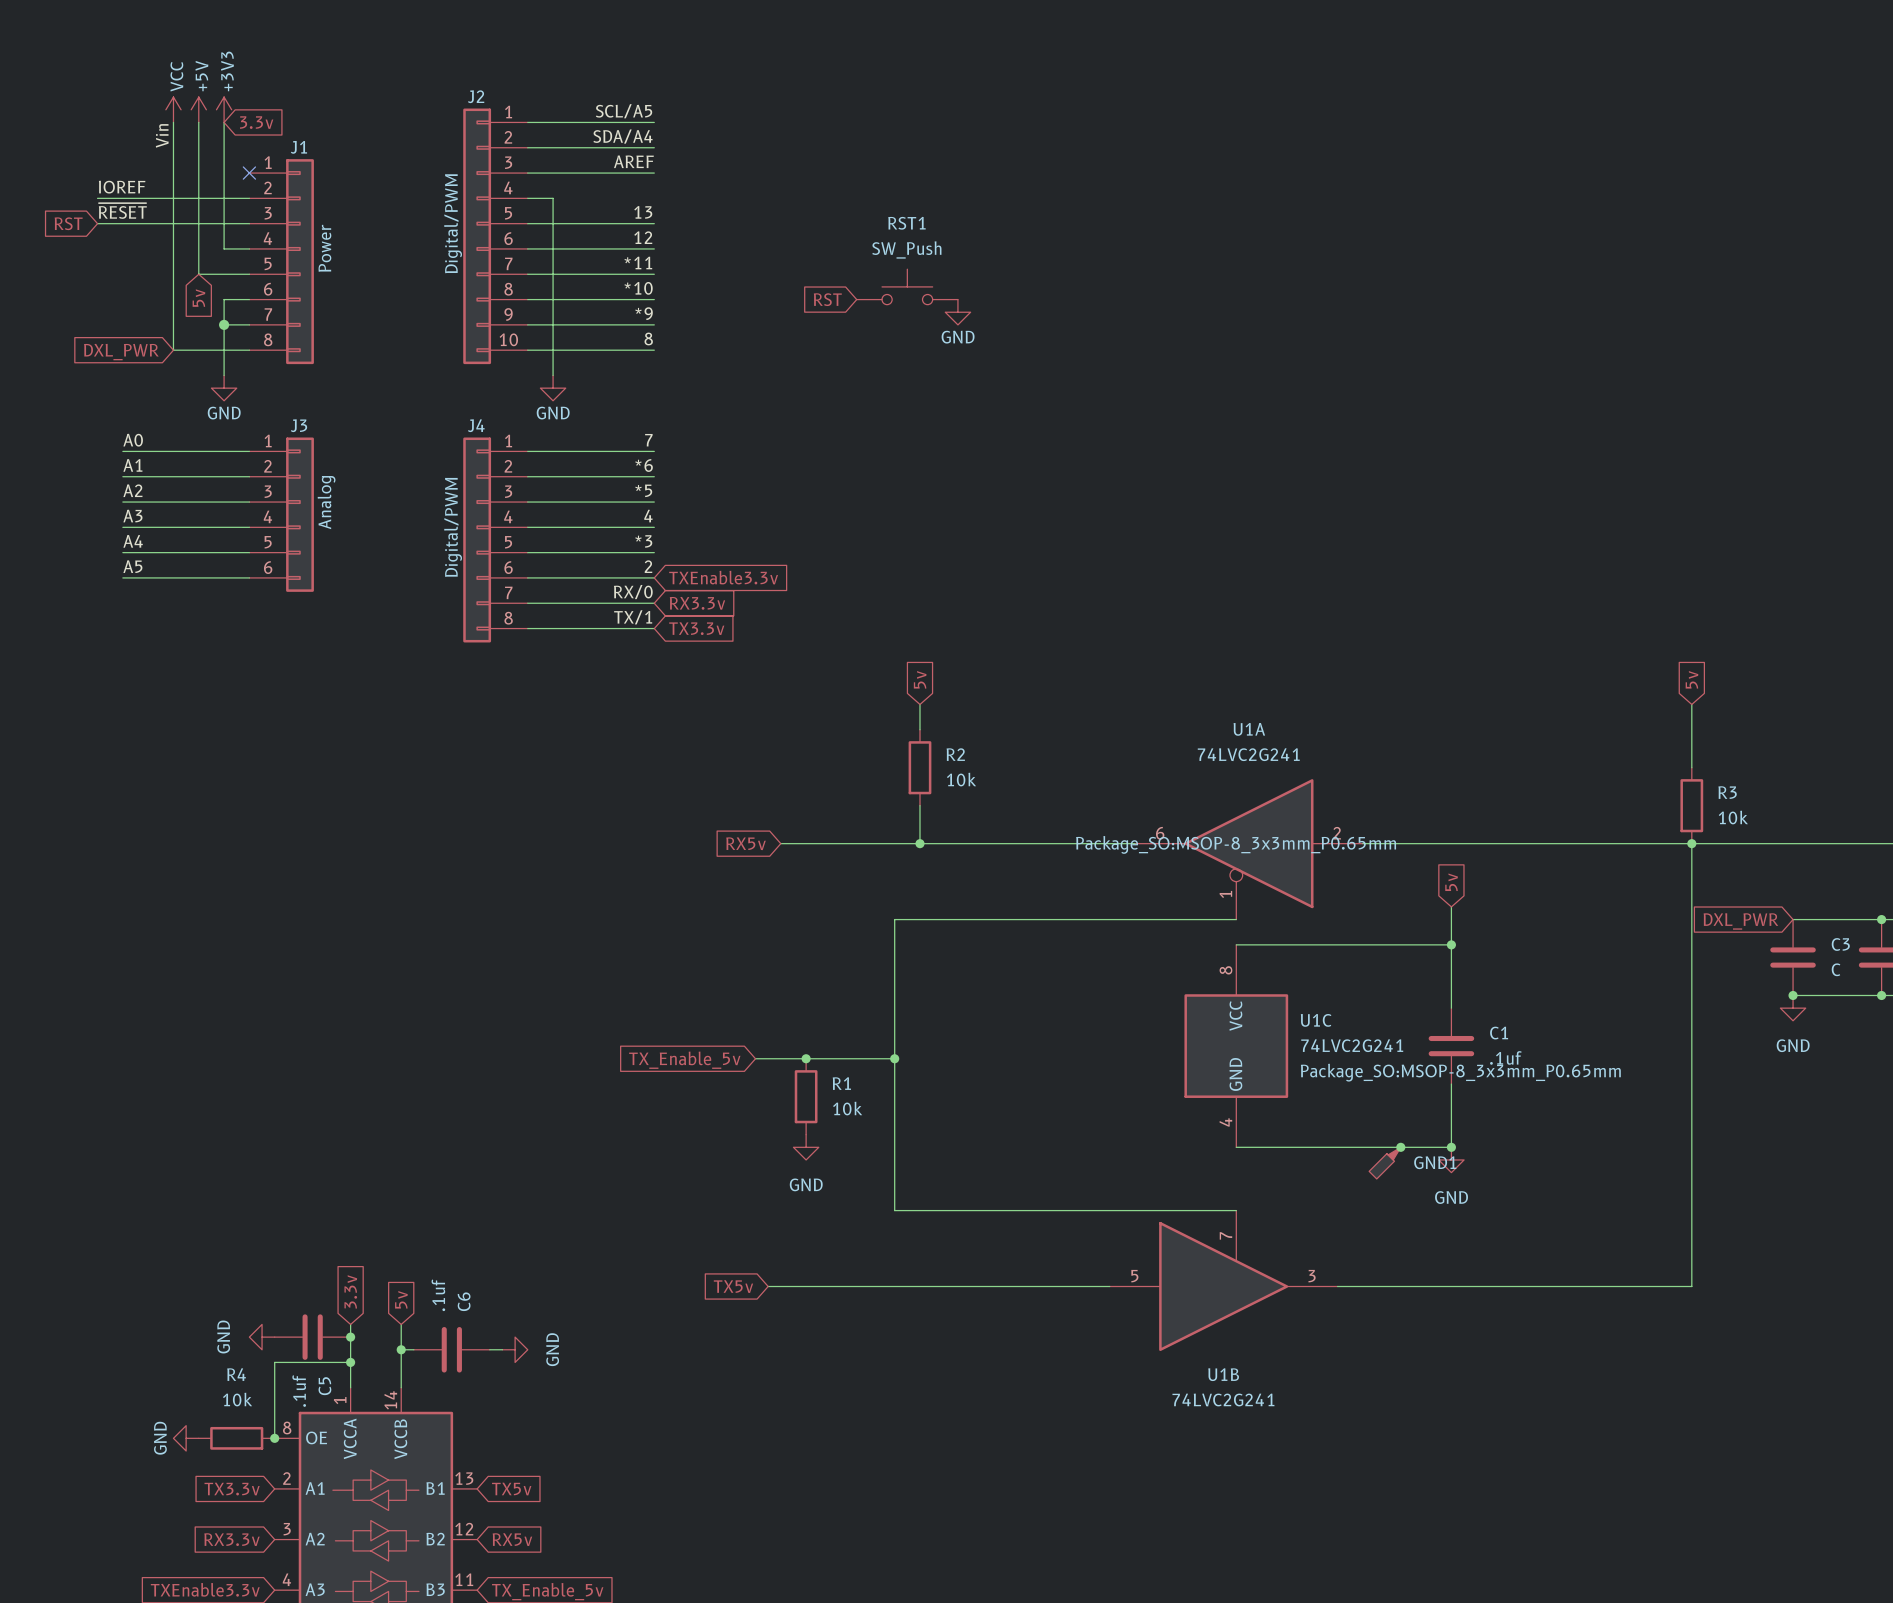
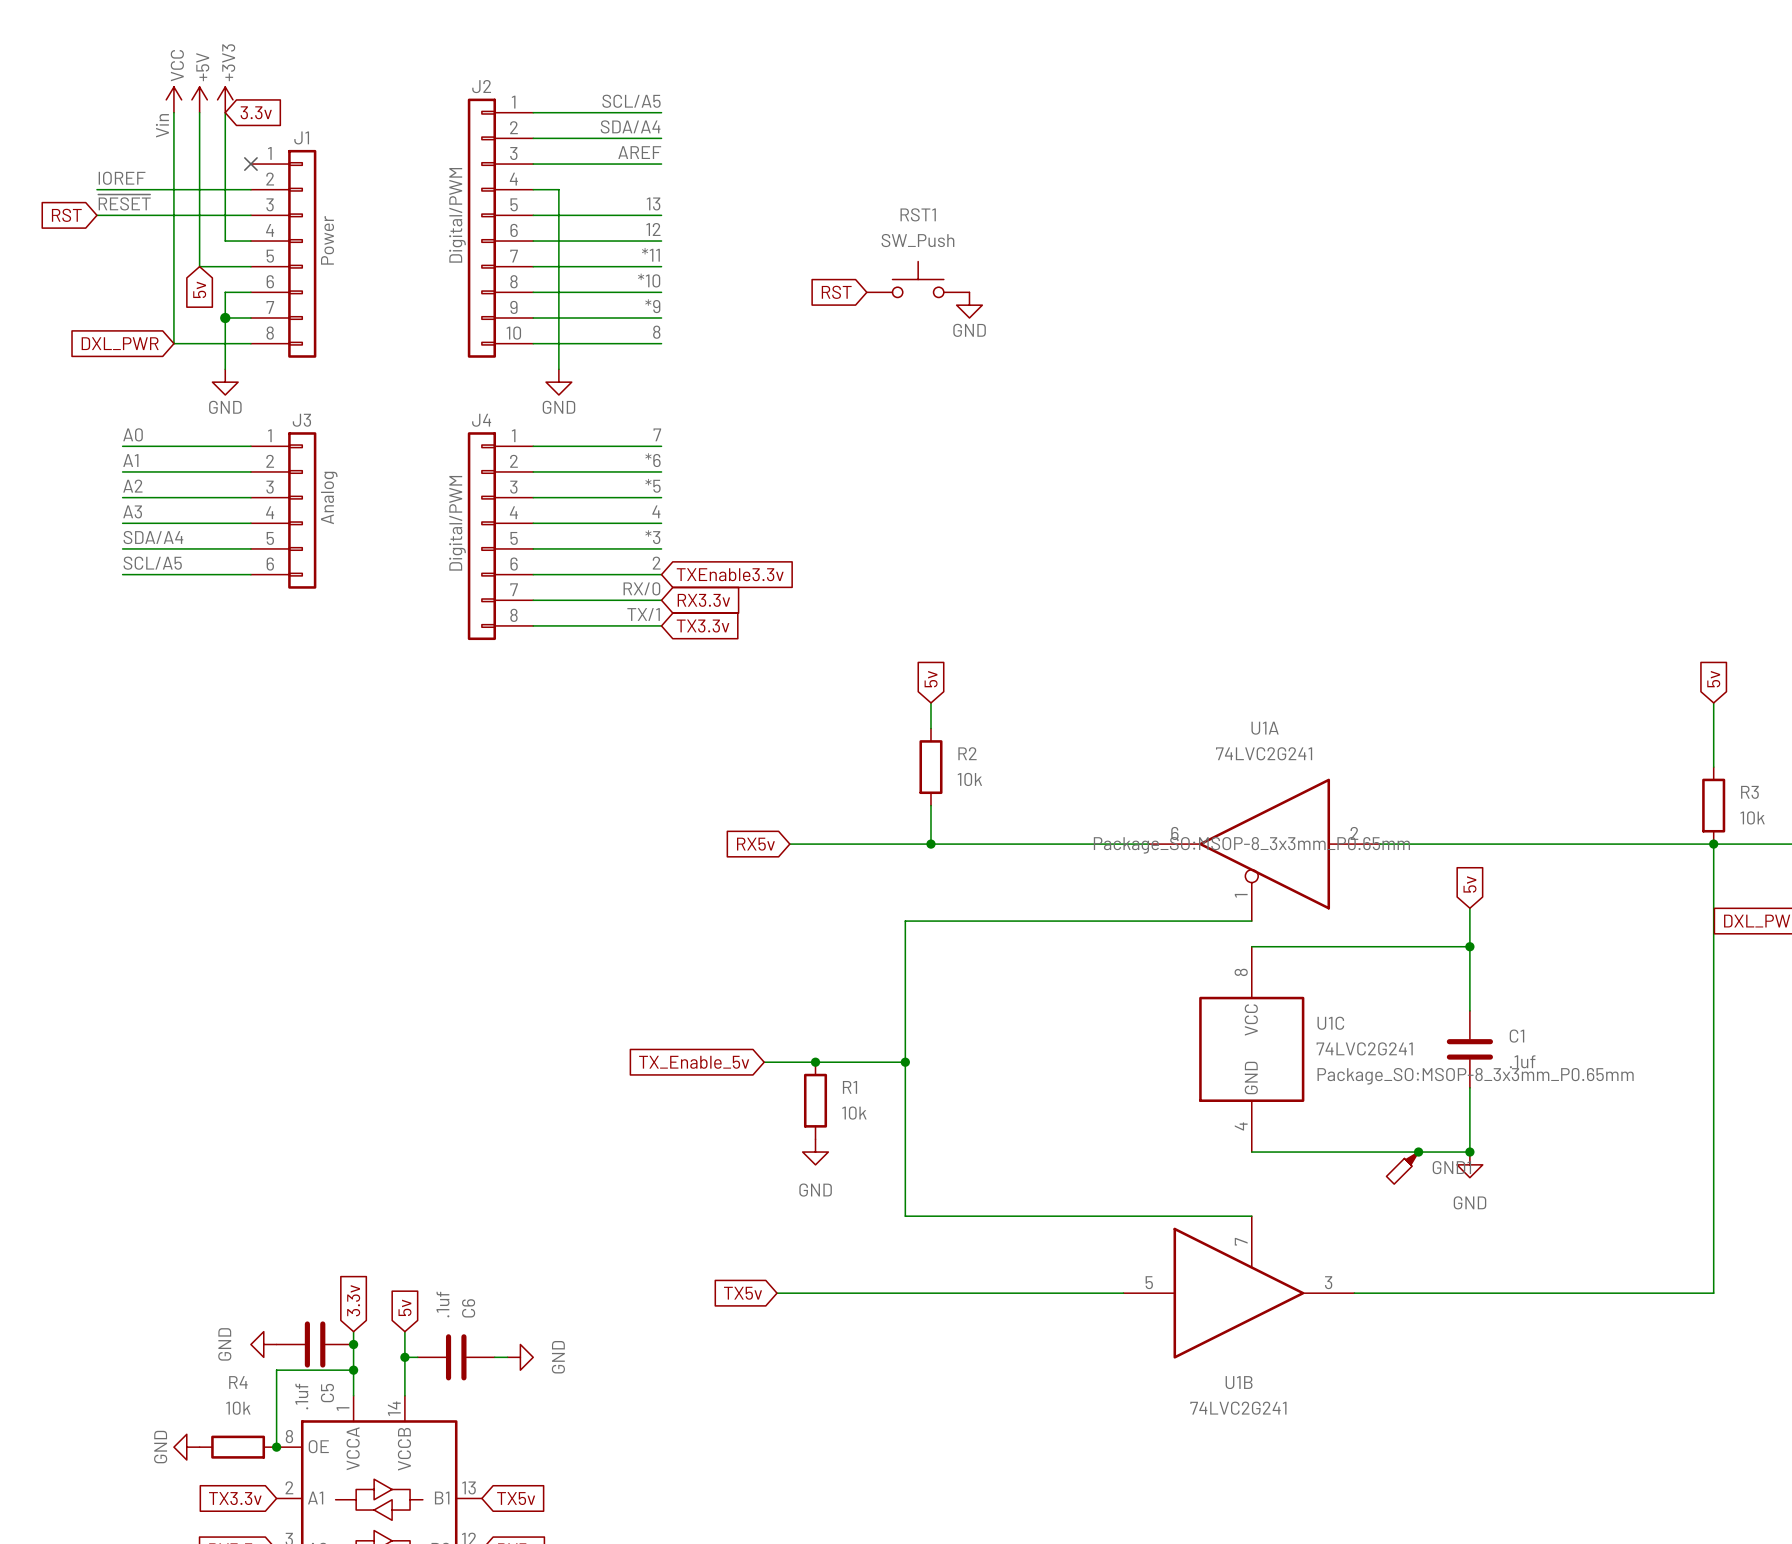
label: A4 (133, 541) -> SDA/A4 (153, 537)
label: A5 (132, 566) -> SCL/A5 (152, 563)

